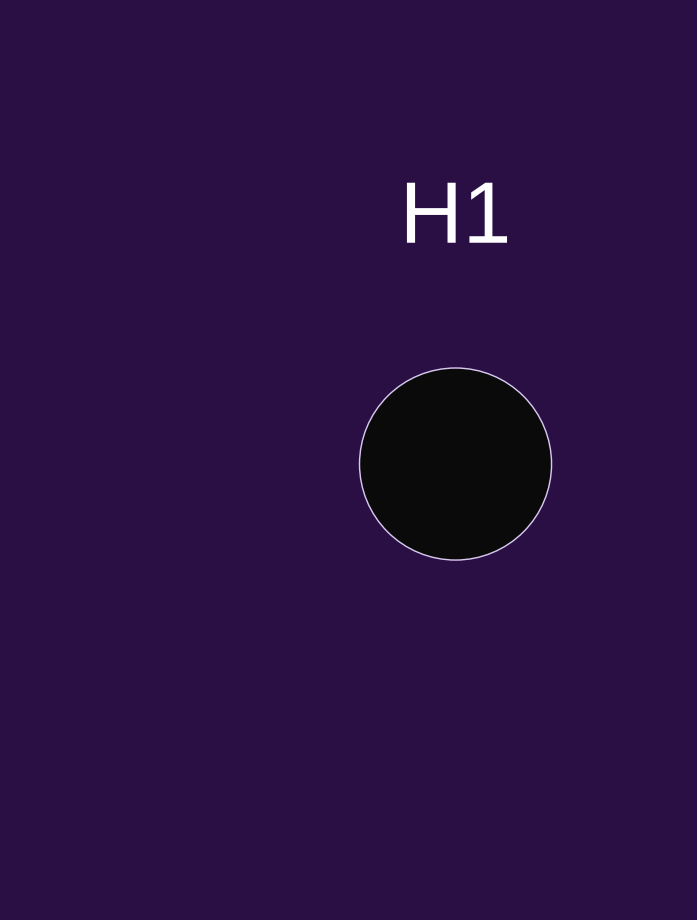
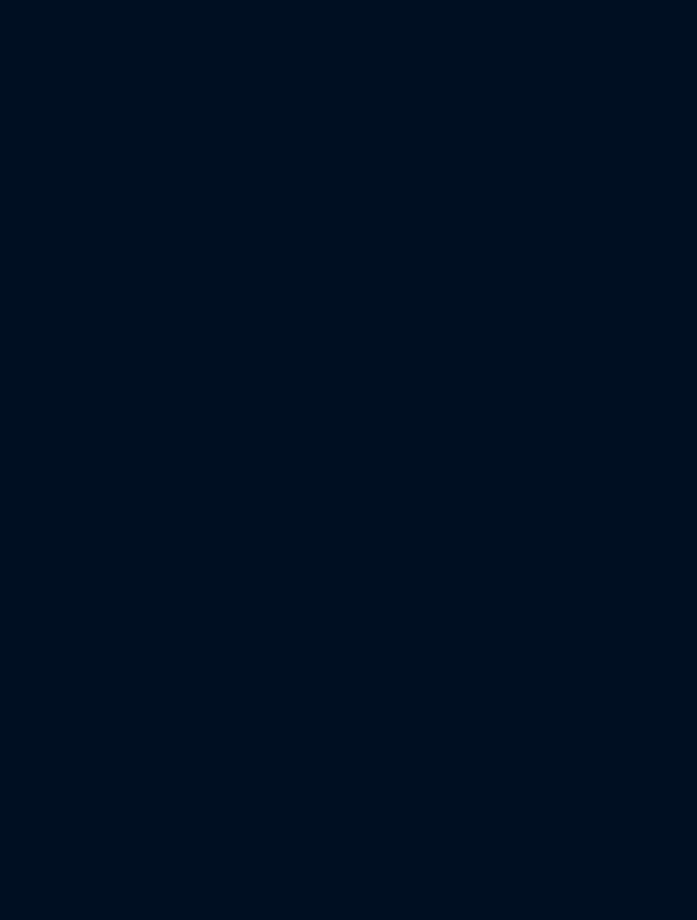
H1: (455, 464) -> none

